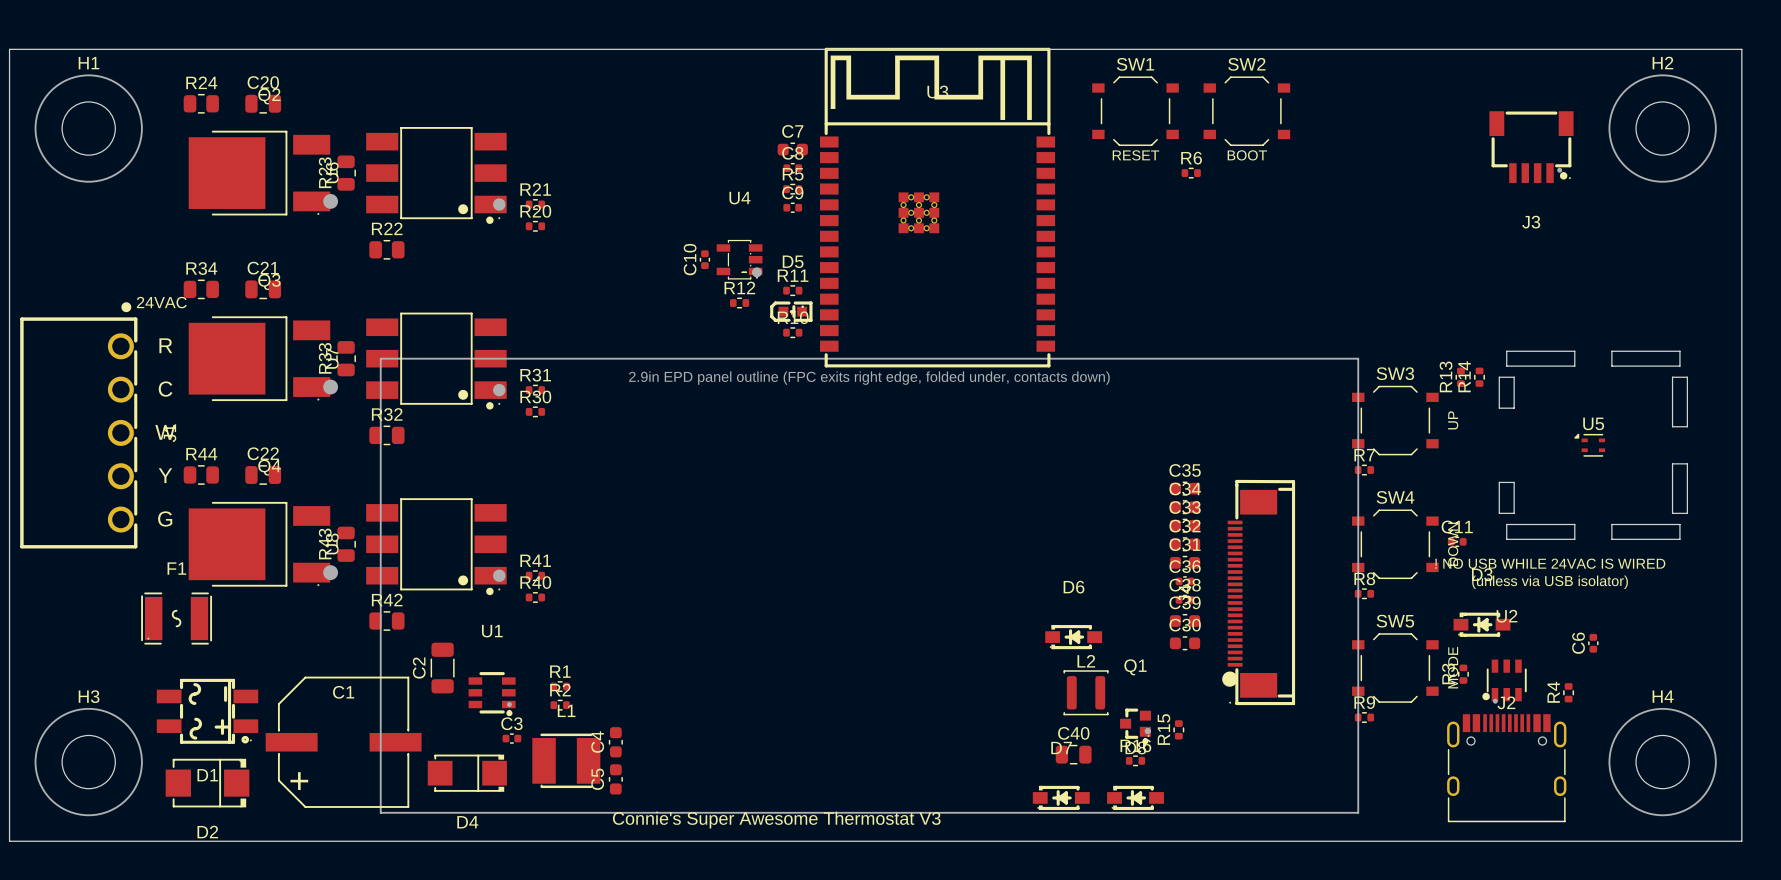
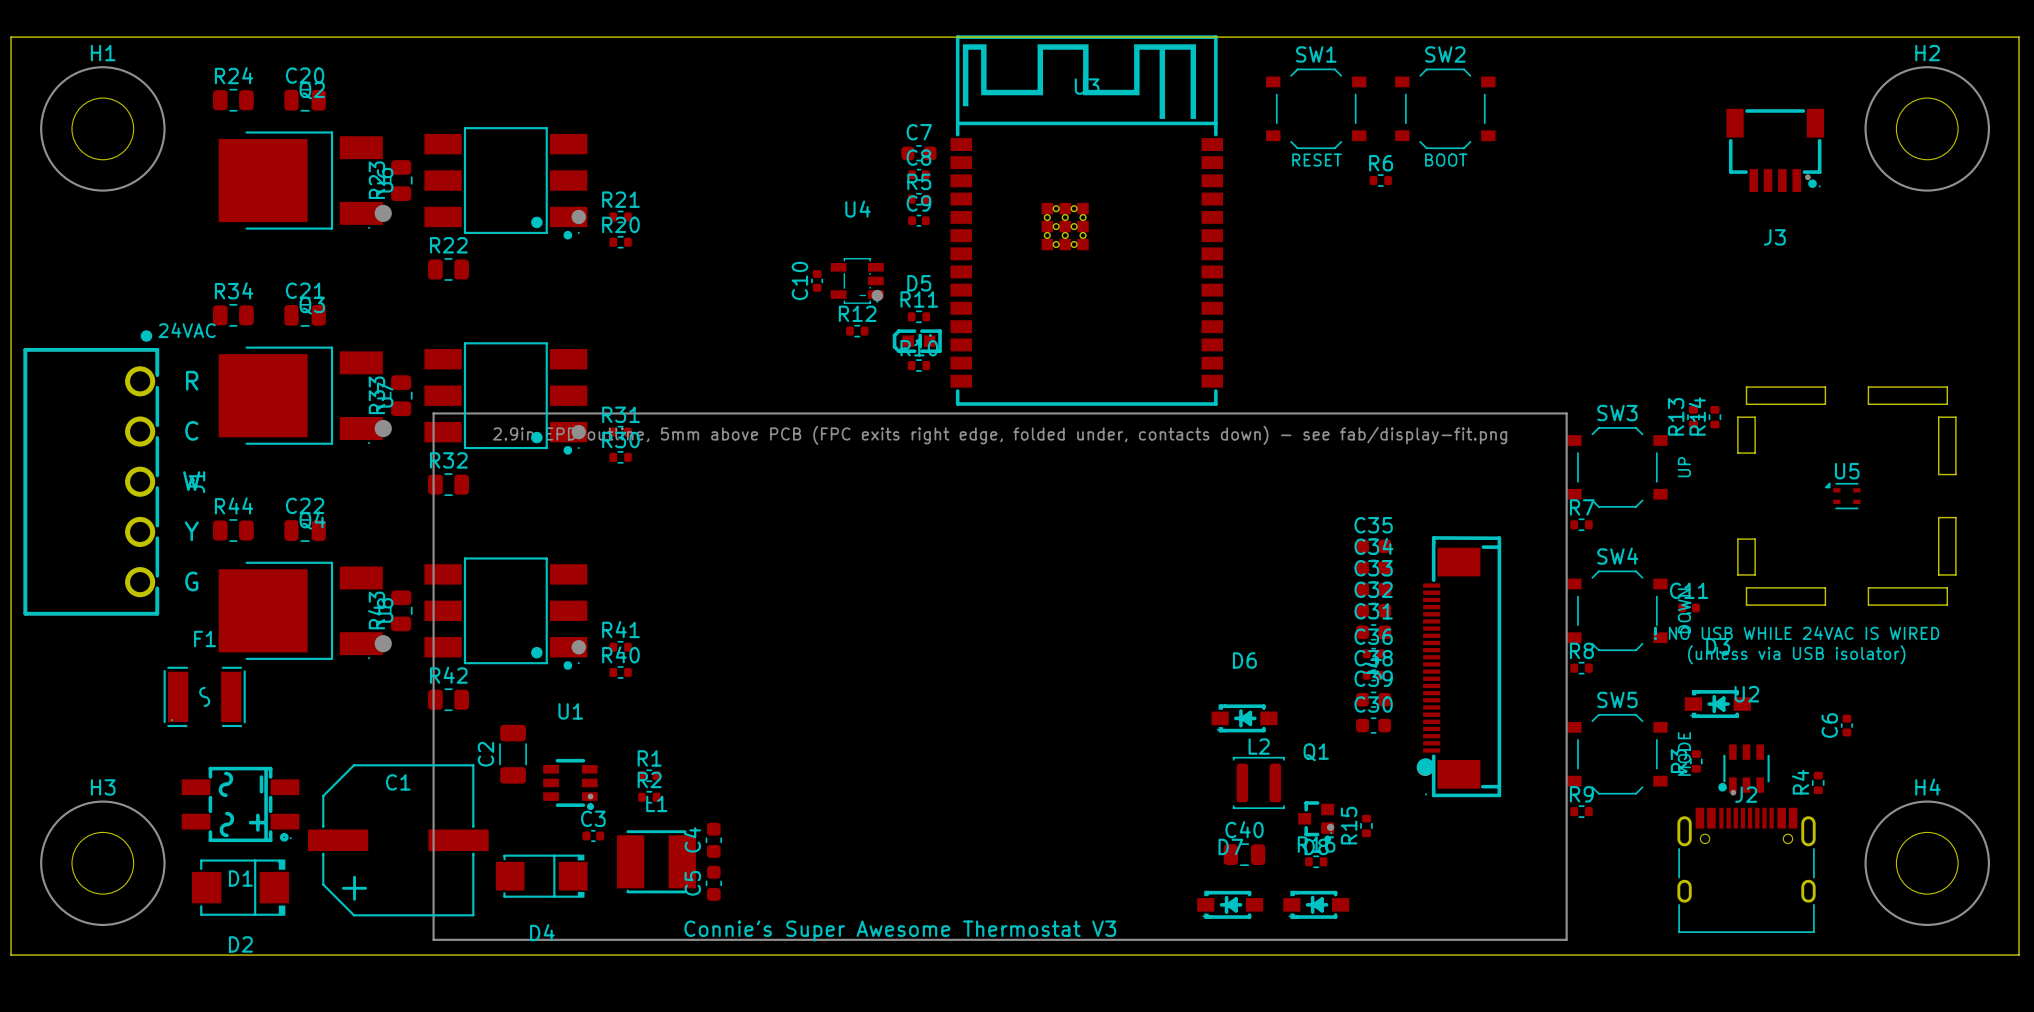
line: (380, 358) (1358, 358) (1358, 812) (380, 812) (380, 358) -> (433, 413) (1566, 413) (1566, 939) (433, 939) (433, 413)
text: 2.9in EPD panel outline (FPC exits right edge, folded under, contacts down) (869, 378) -> 2.9in EPD outline, 5mm above PCB (FPC exits right edge, folded under, contacts down) - see fab/display-fit.png (1000, 435)

